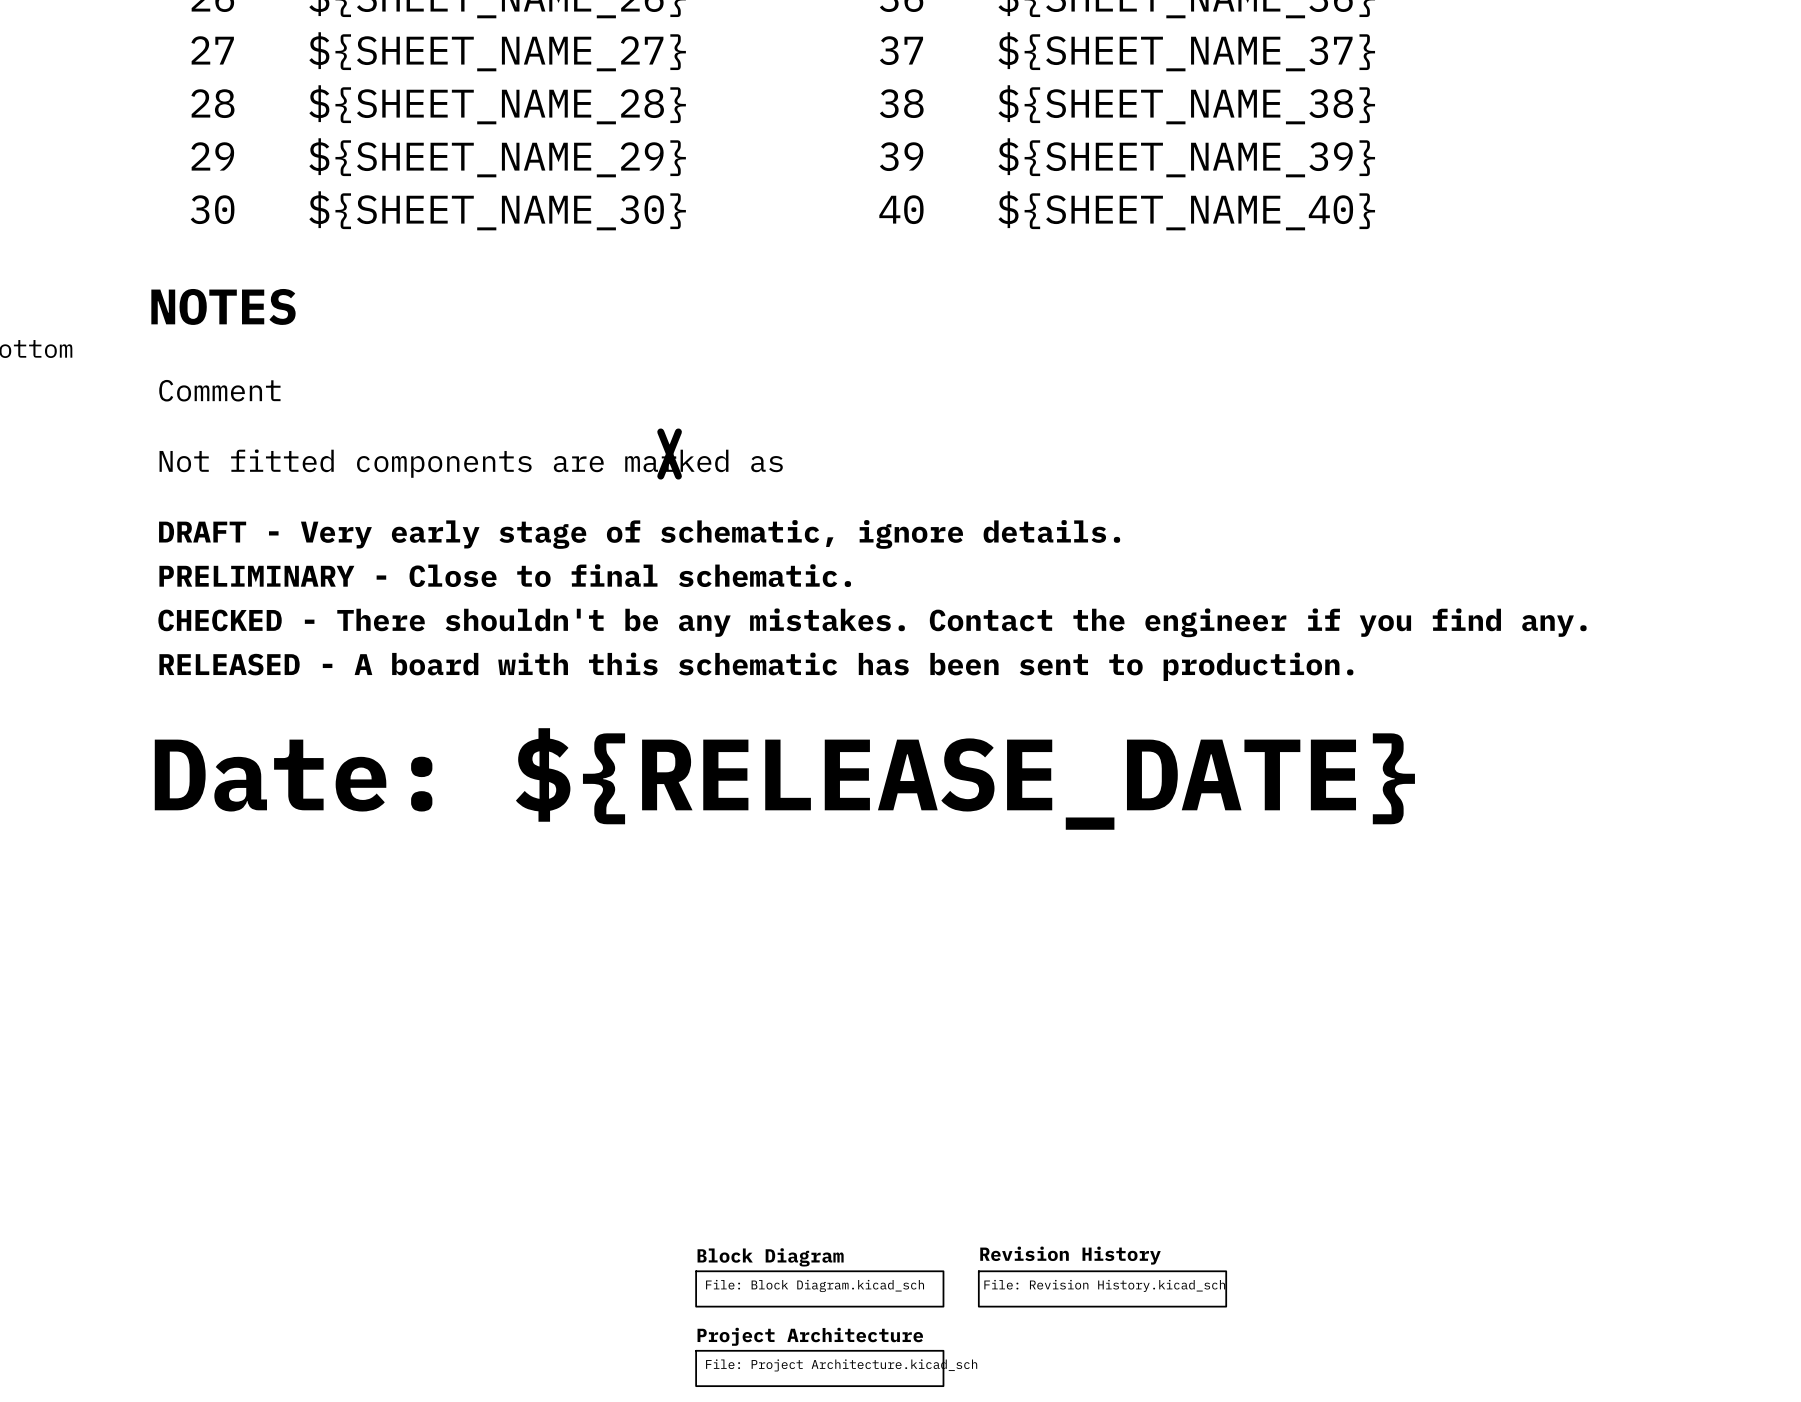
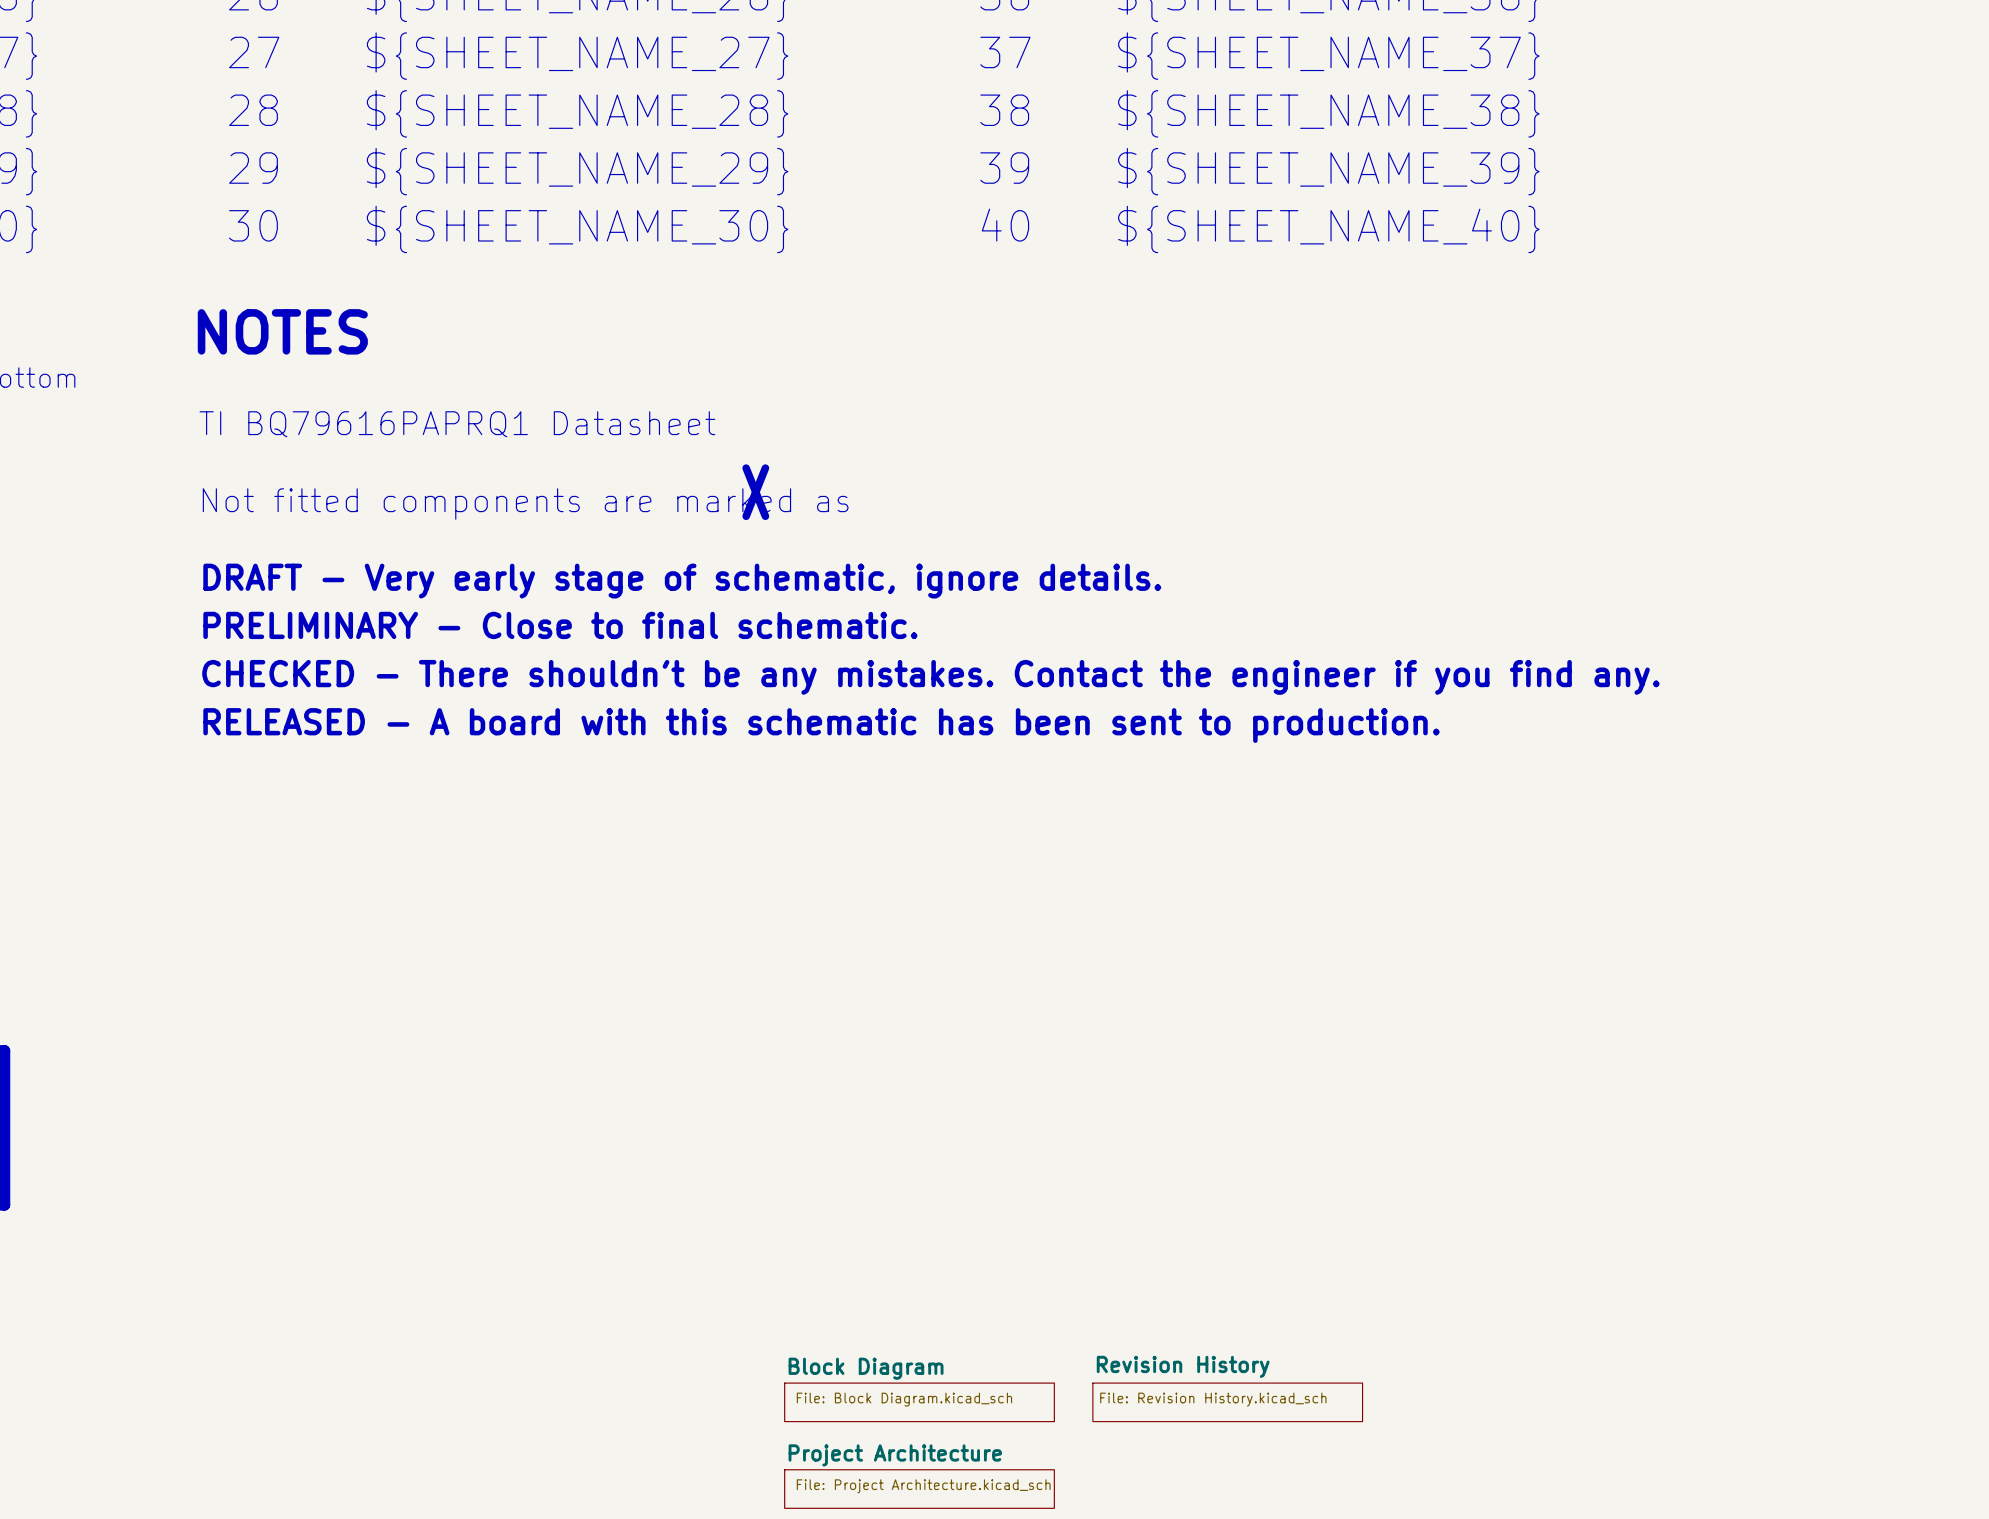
text: Comment (219, 390) -> TI BQ79616PAPRQ1 Datasheet (457, 424)
text: Date: ${RELEASE_DATE} (784, 778) -> none

